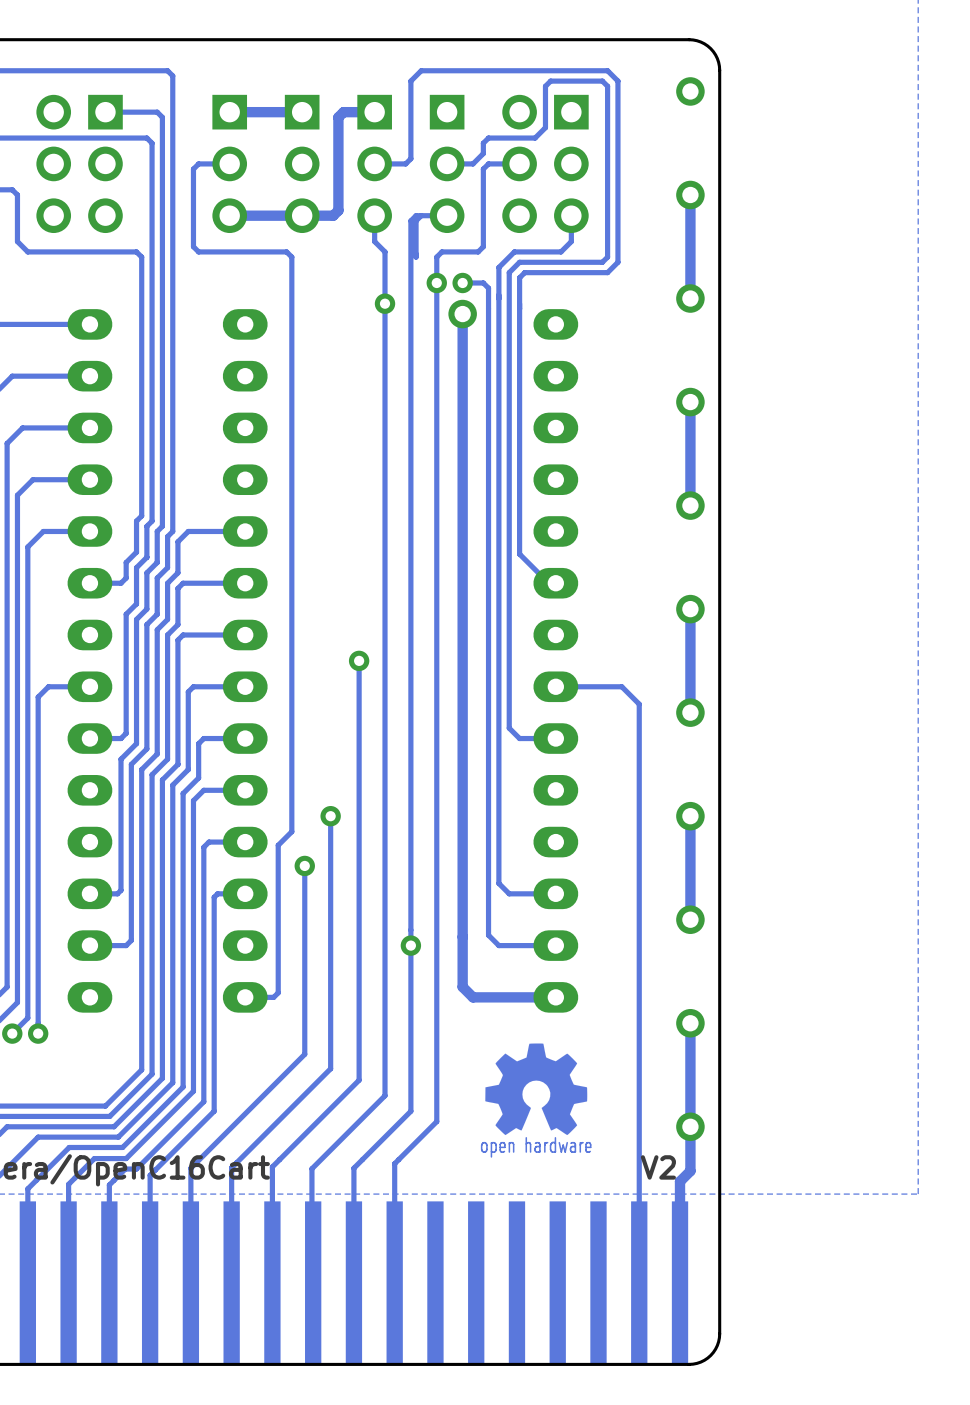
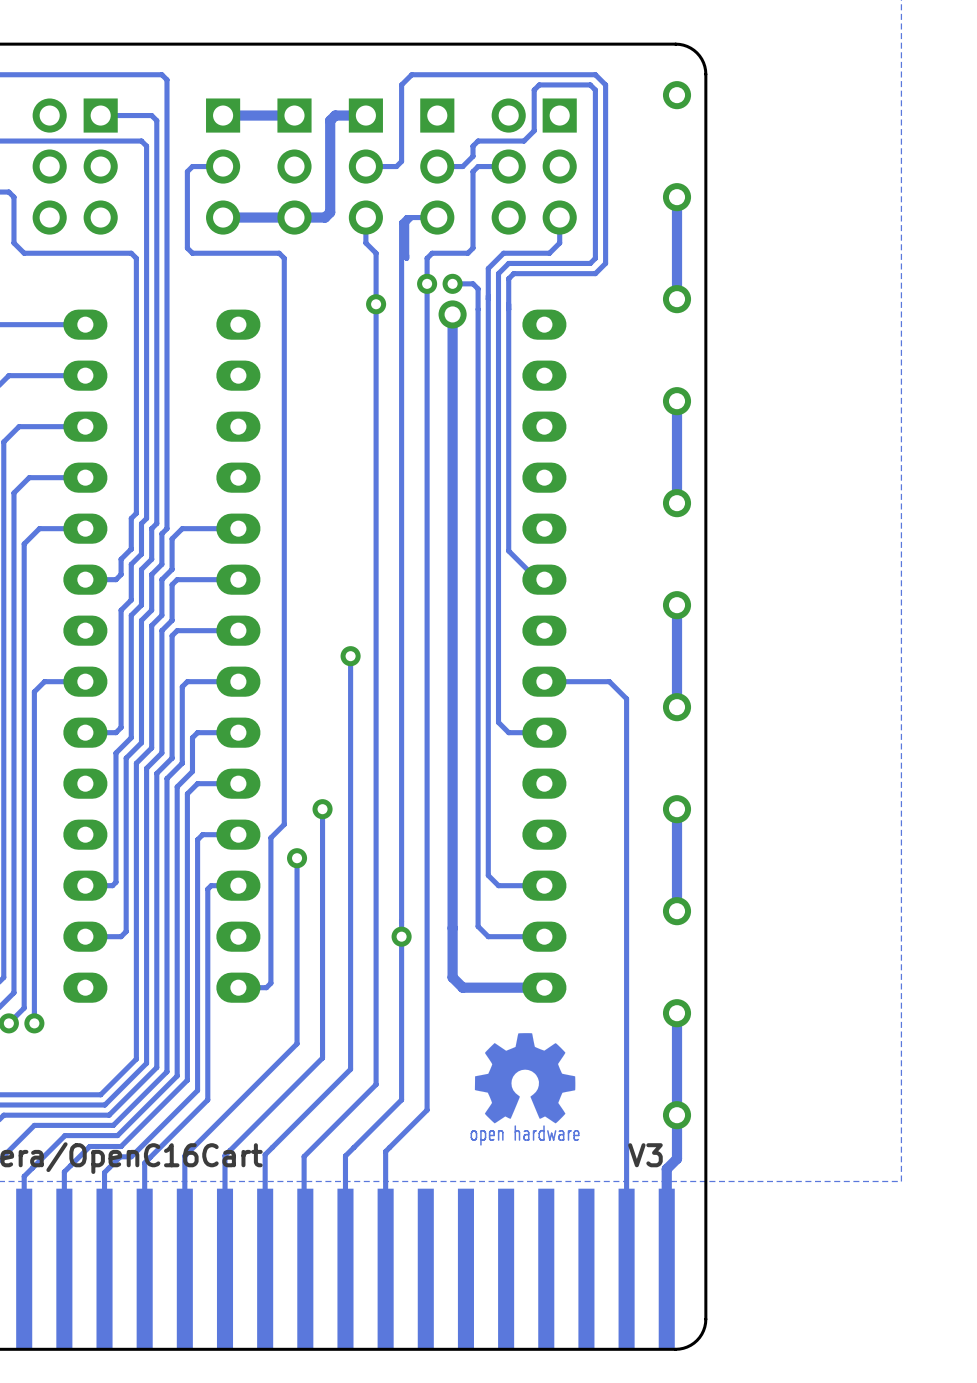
text: V2 (658, 1167) -> V3 (645, 1155)

